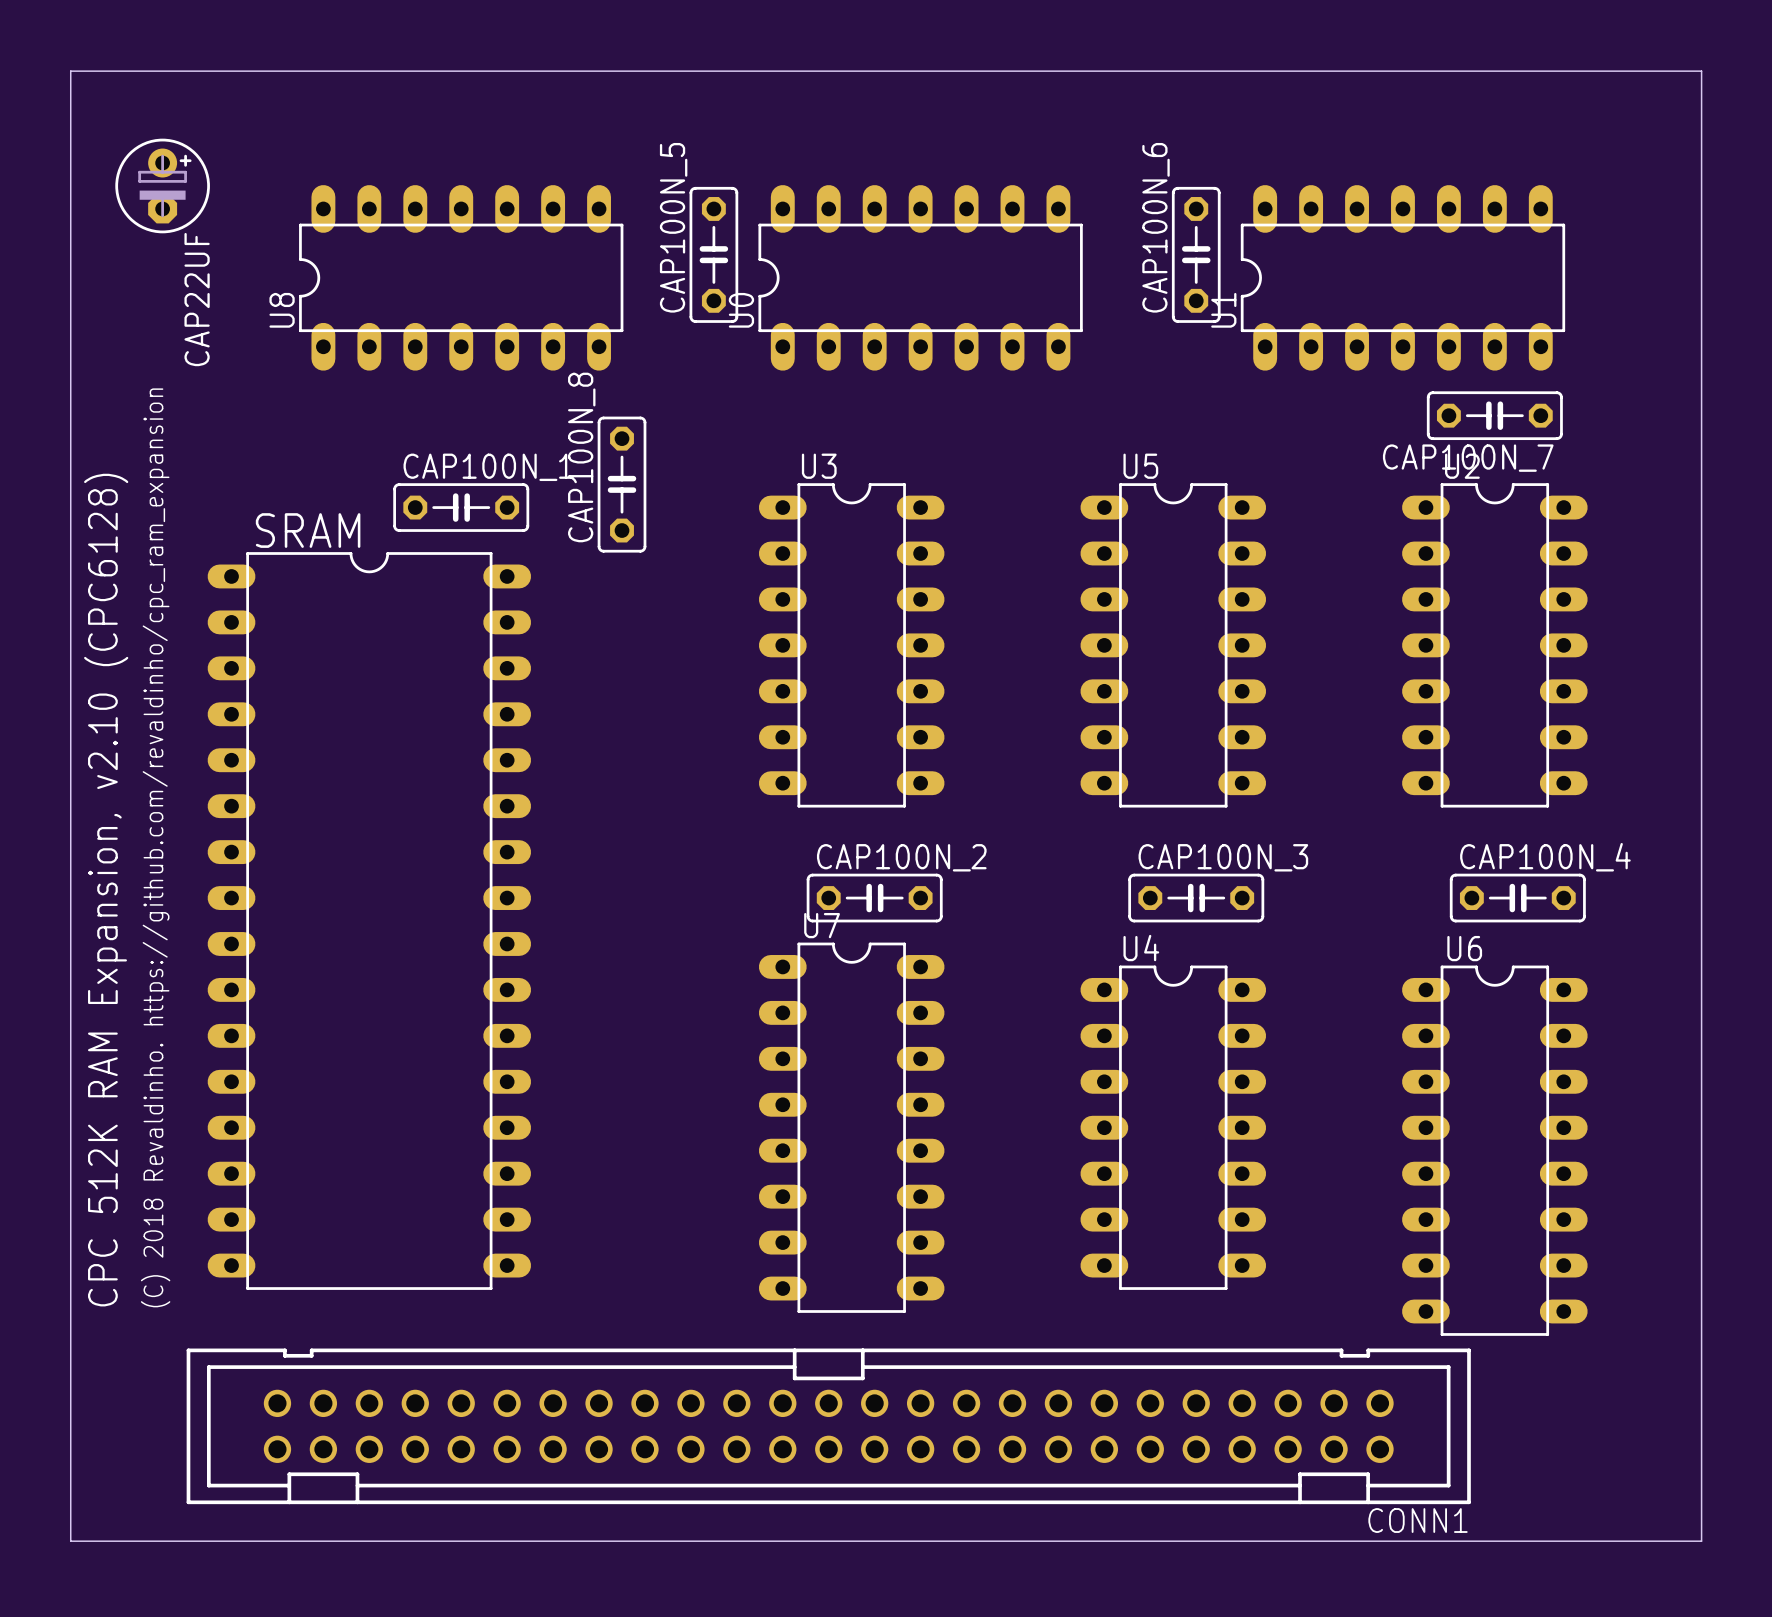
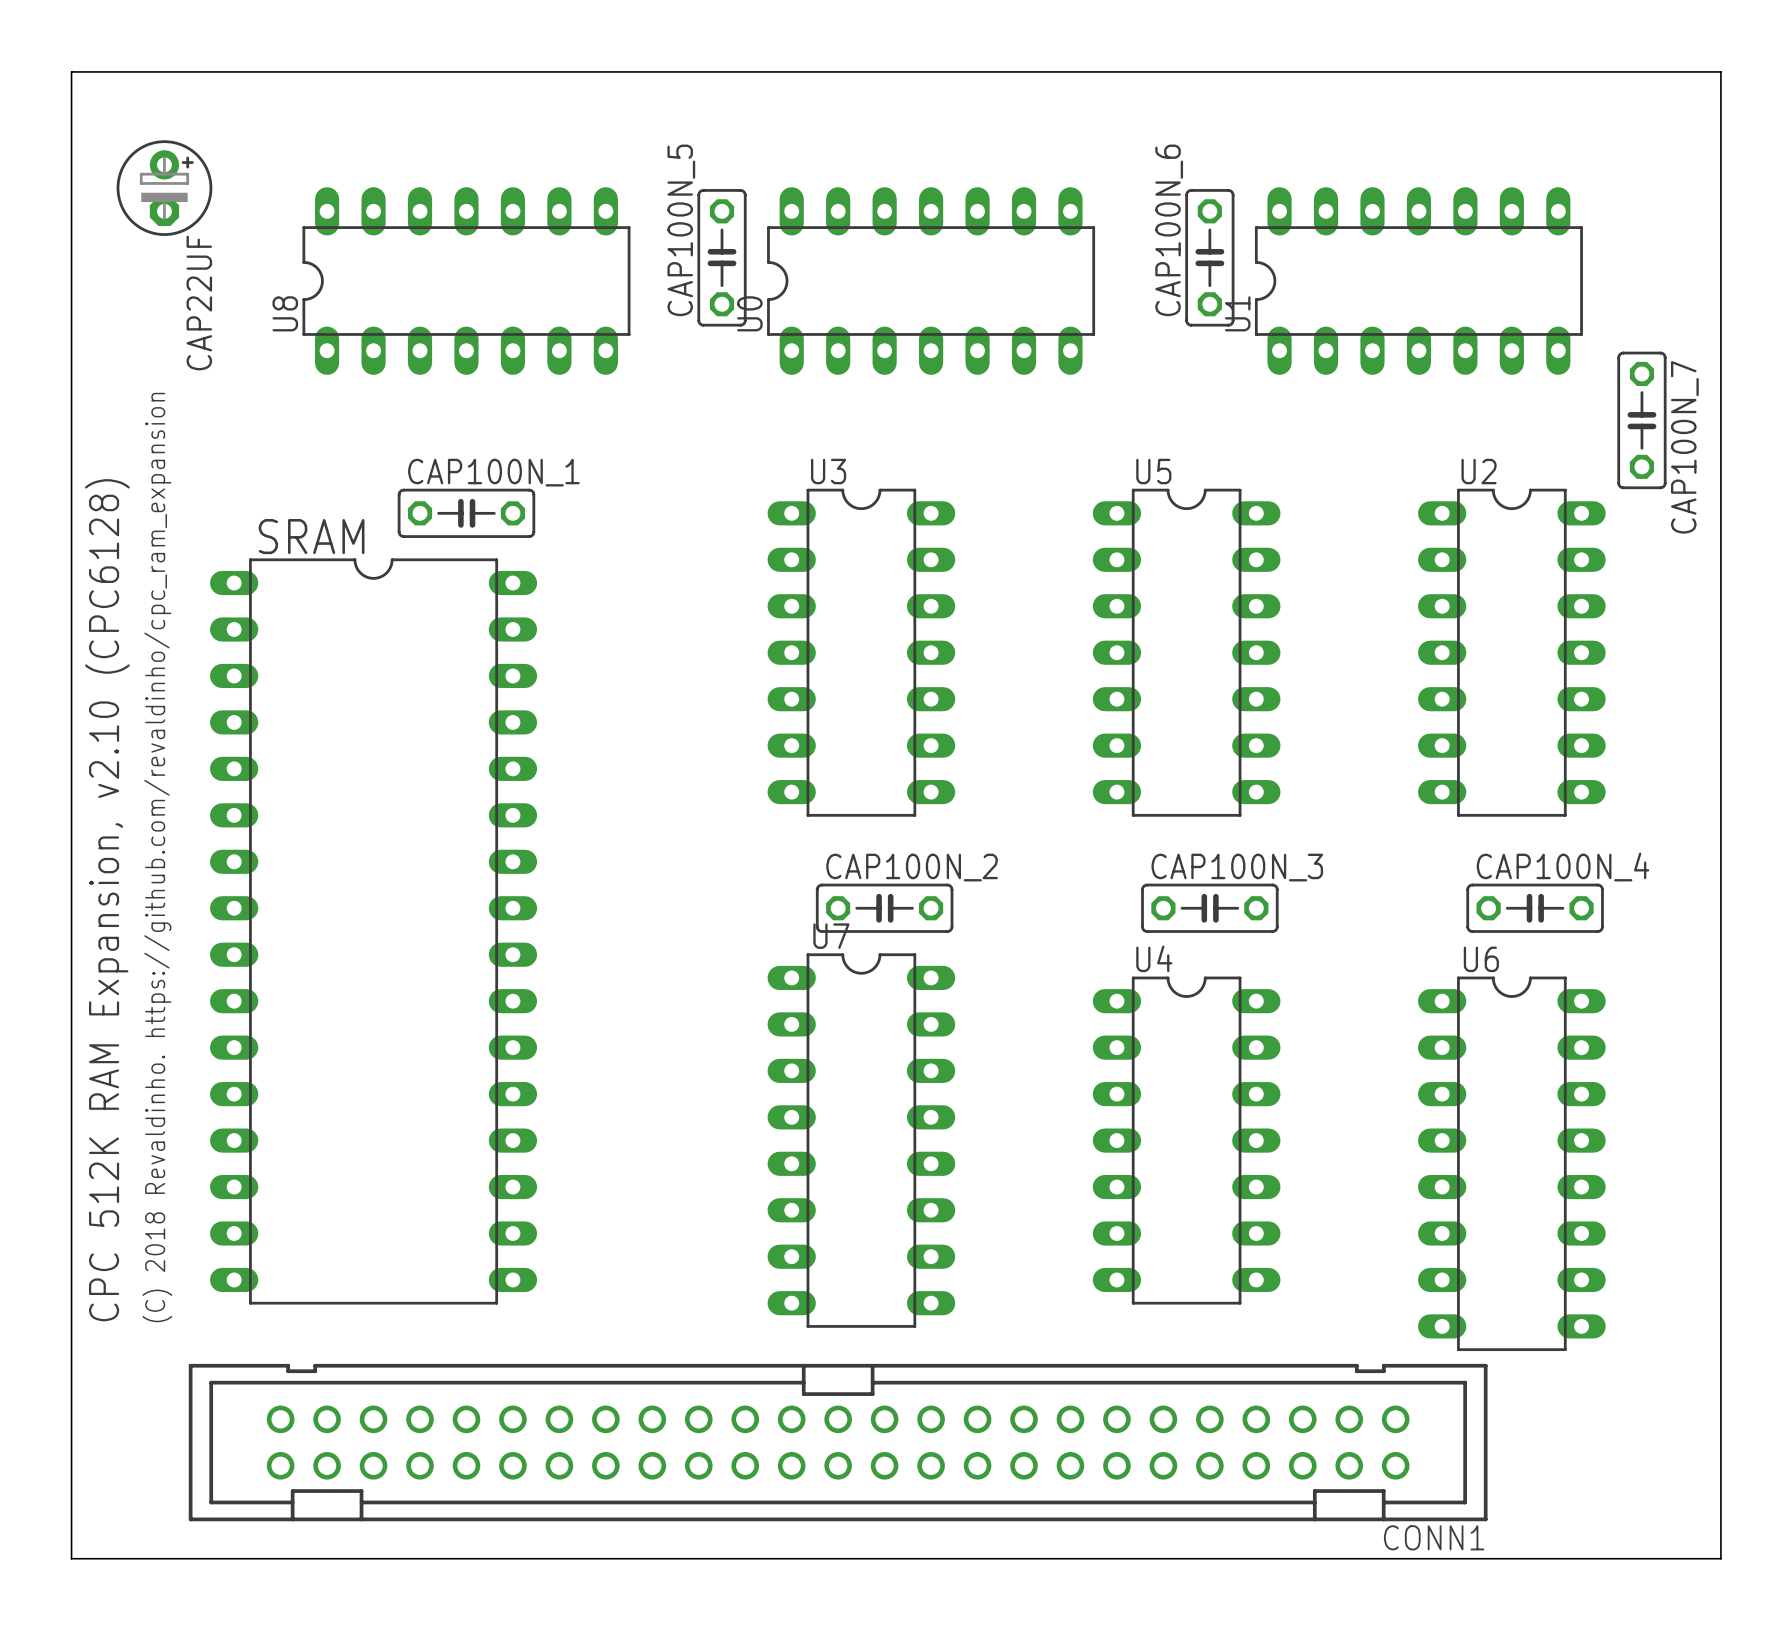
CAP100N_7 rotation: 0° (1494, 415) -> 90° counterclockwise (1641, 420)
CAP100N_7 position: (1494, 415) -> (1641, 420)
CAP100N_8: (622, 484) -> none

